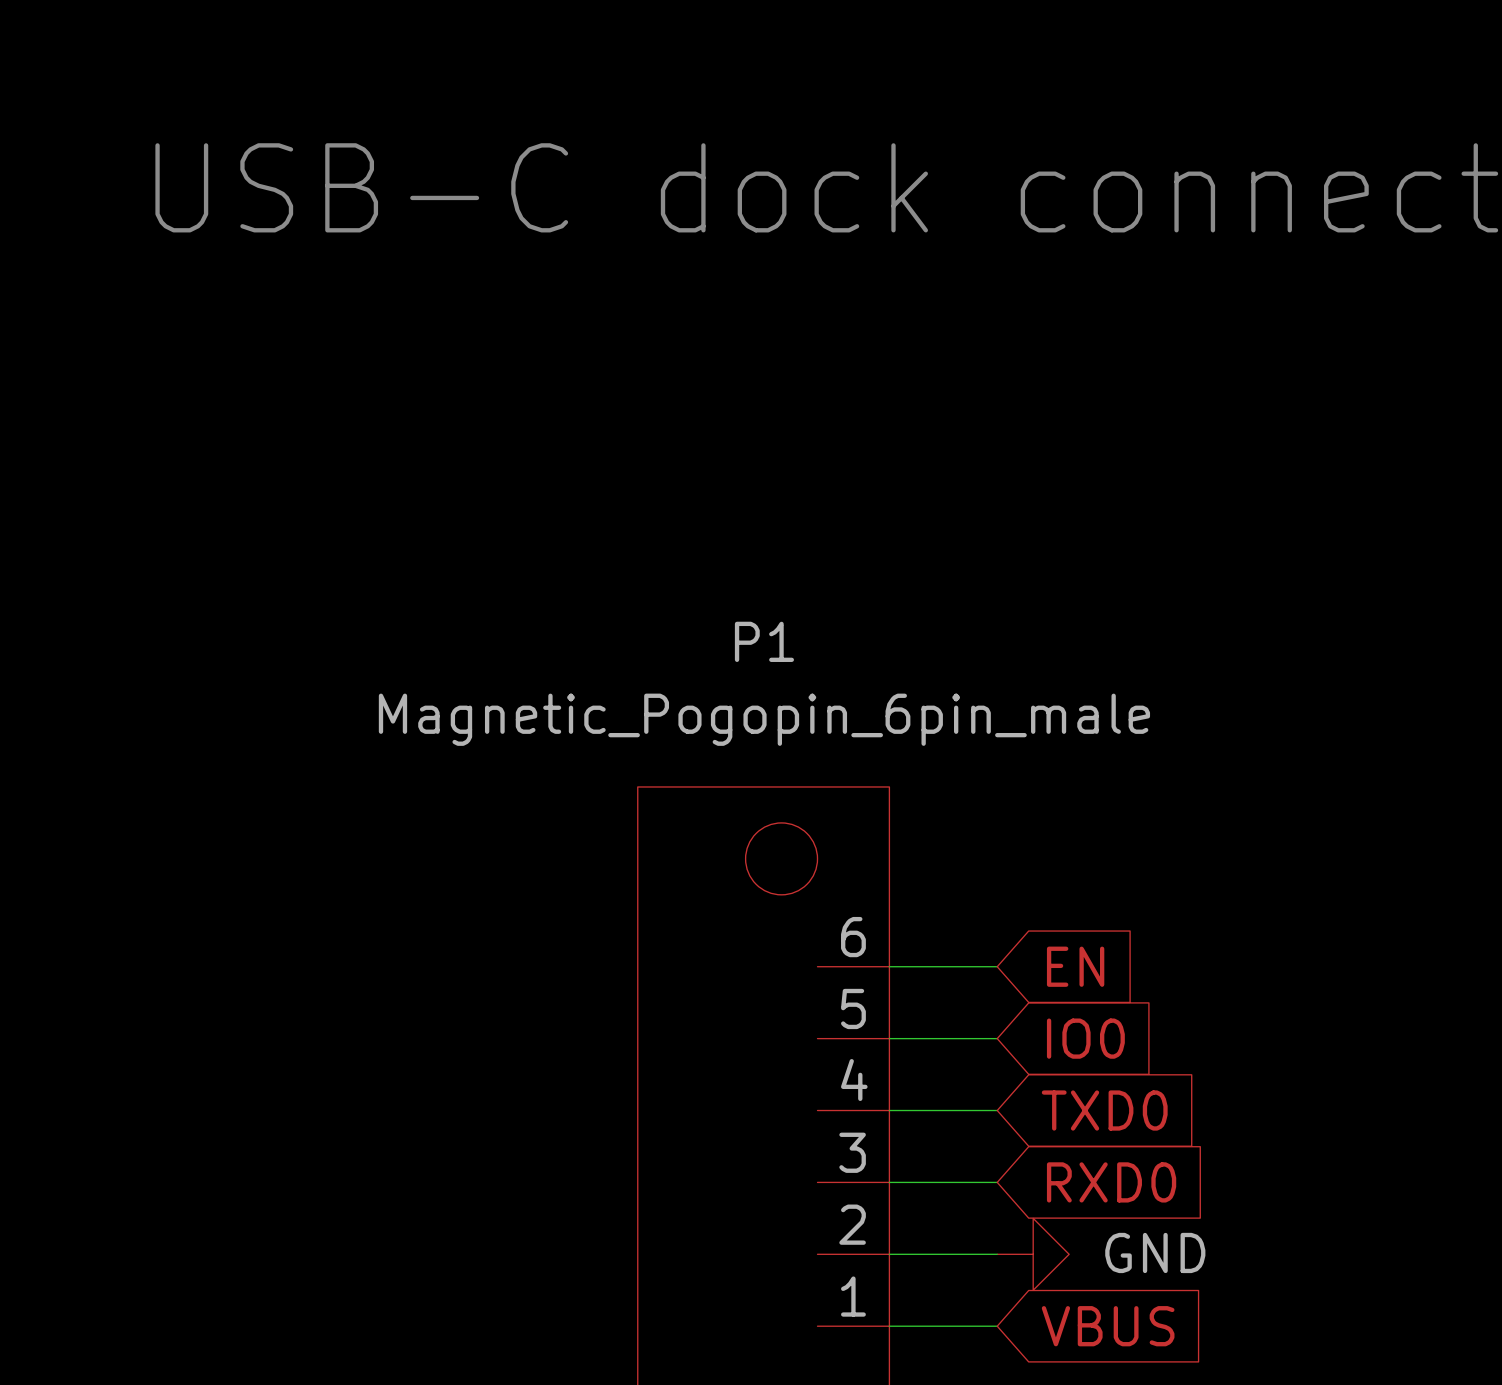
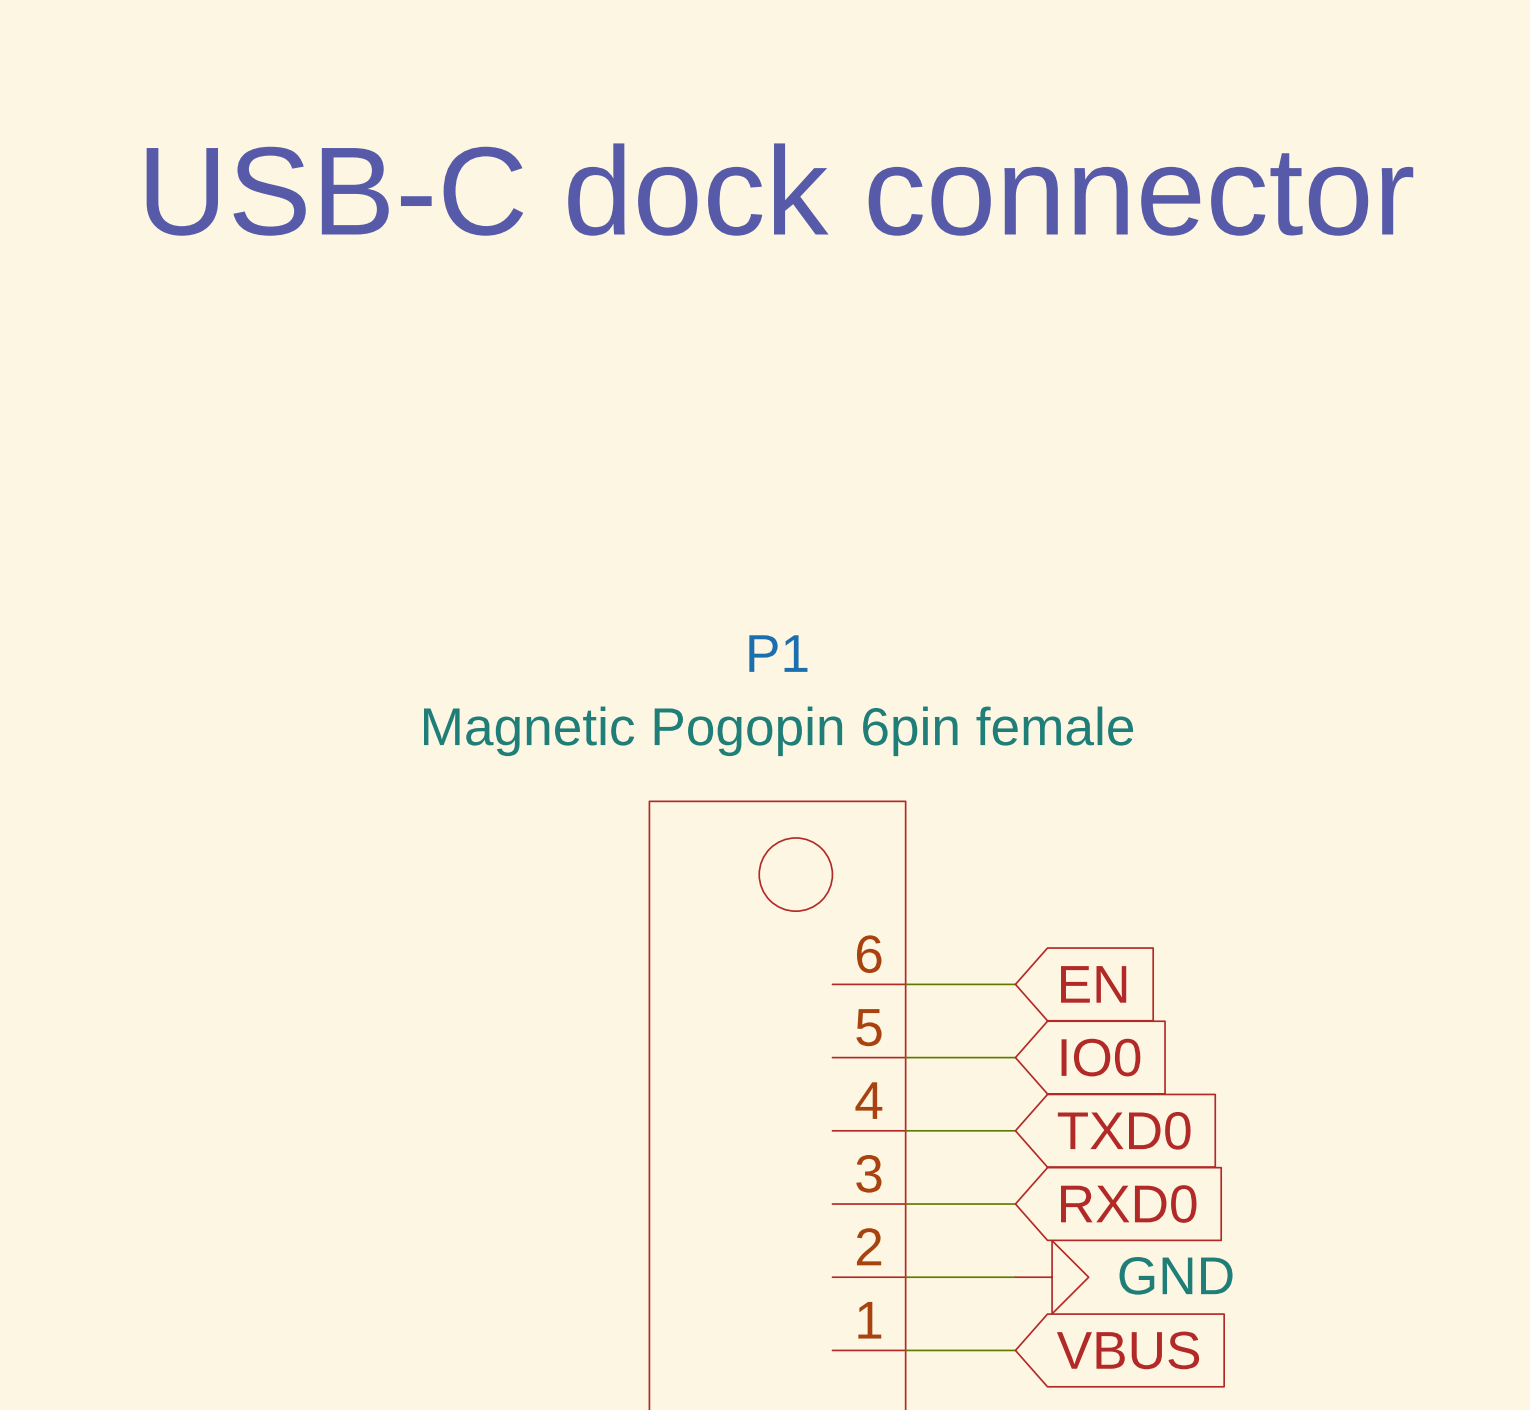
P1 value: Magnetic_Pogopin_6pin_male (764, 719) -> Magnetic Pogopin 6pin female (778, 731)

